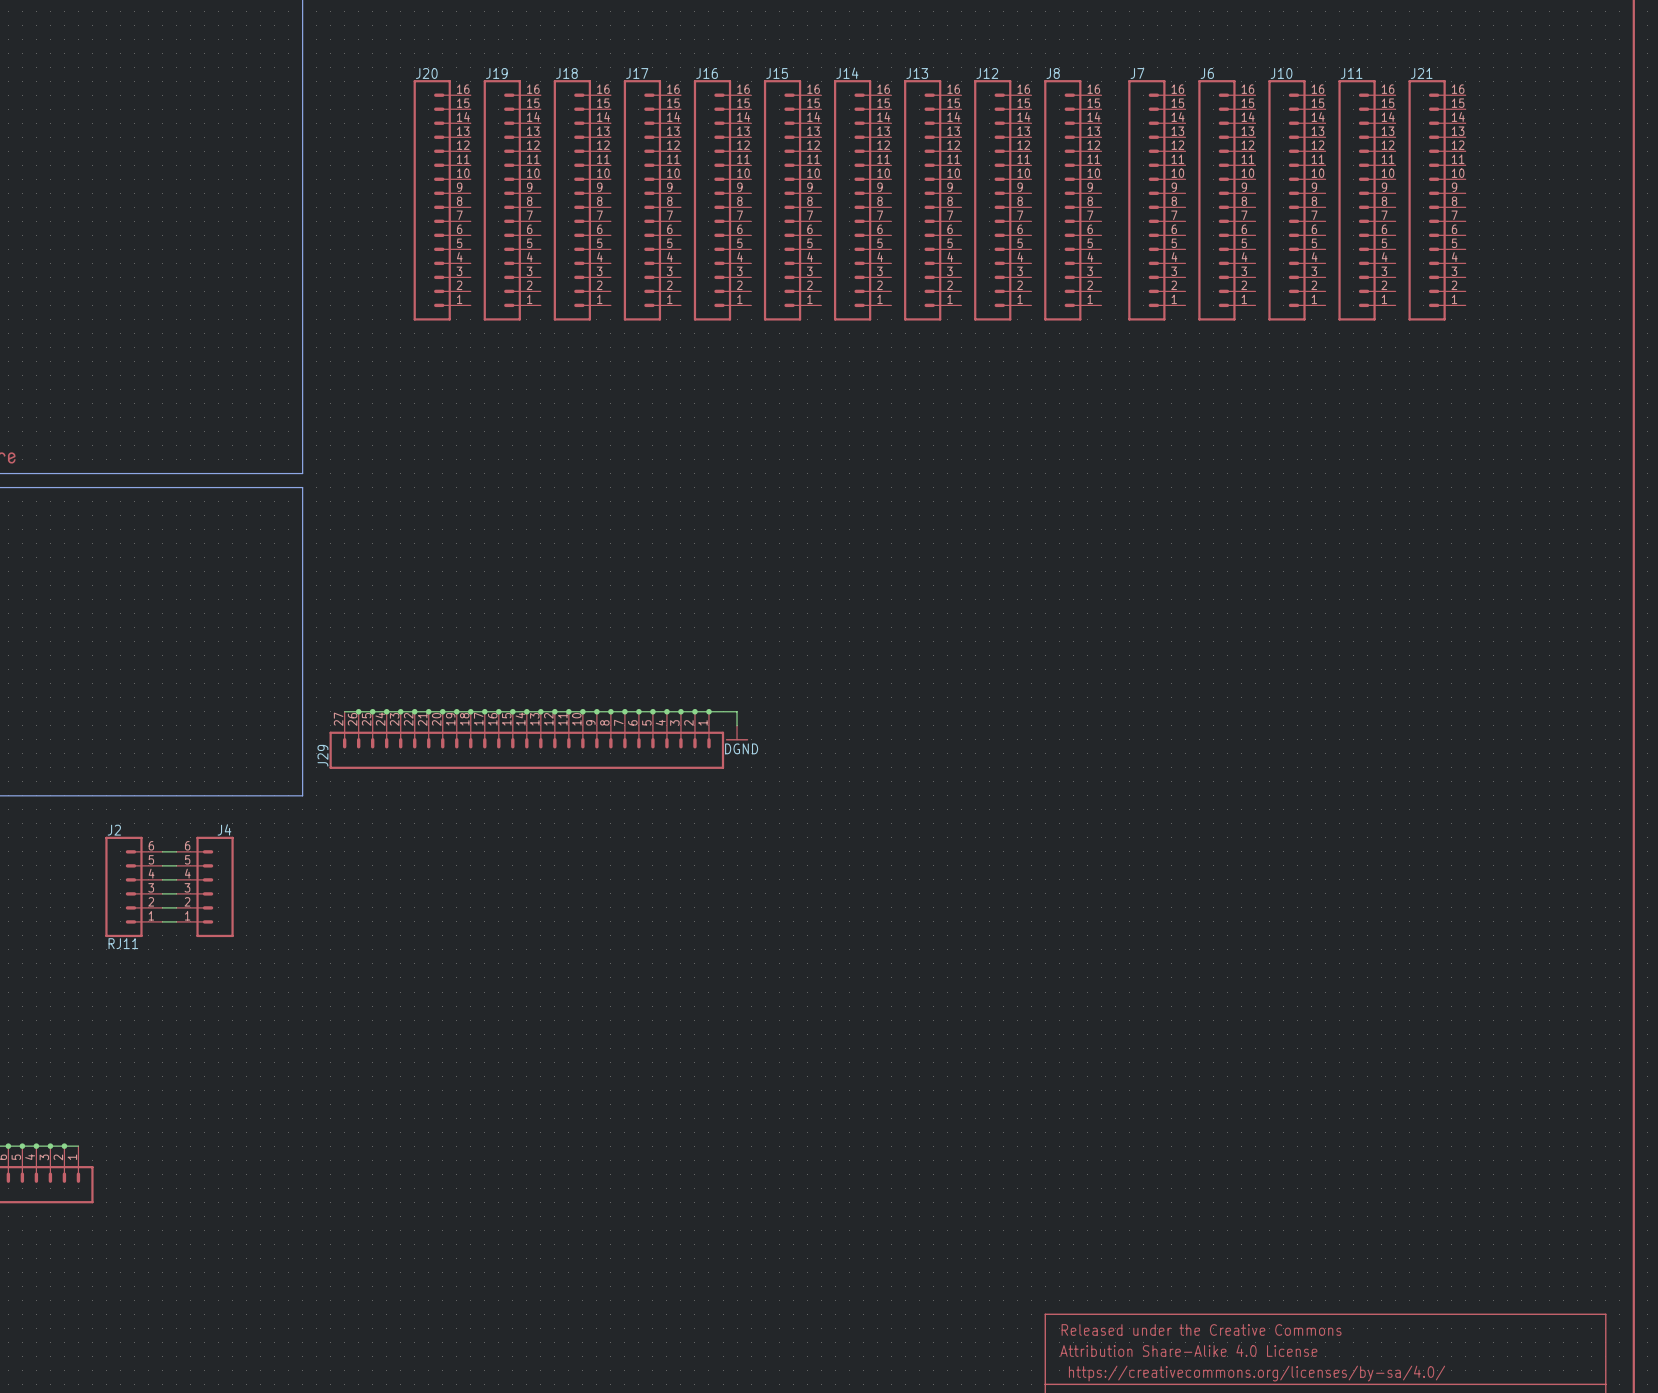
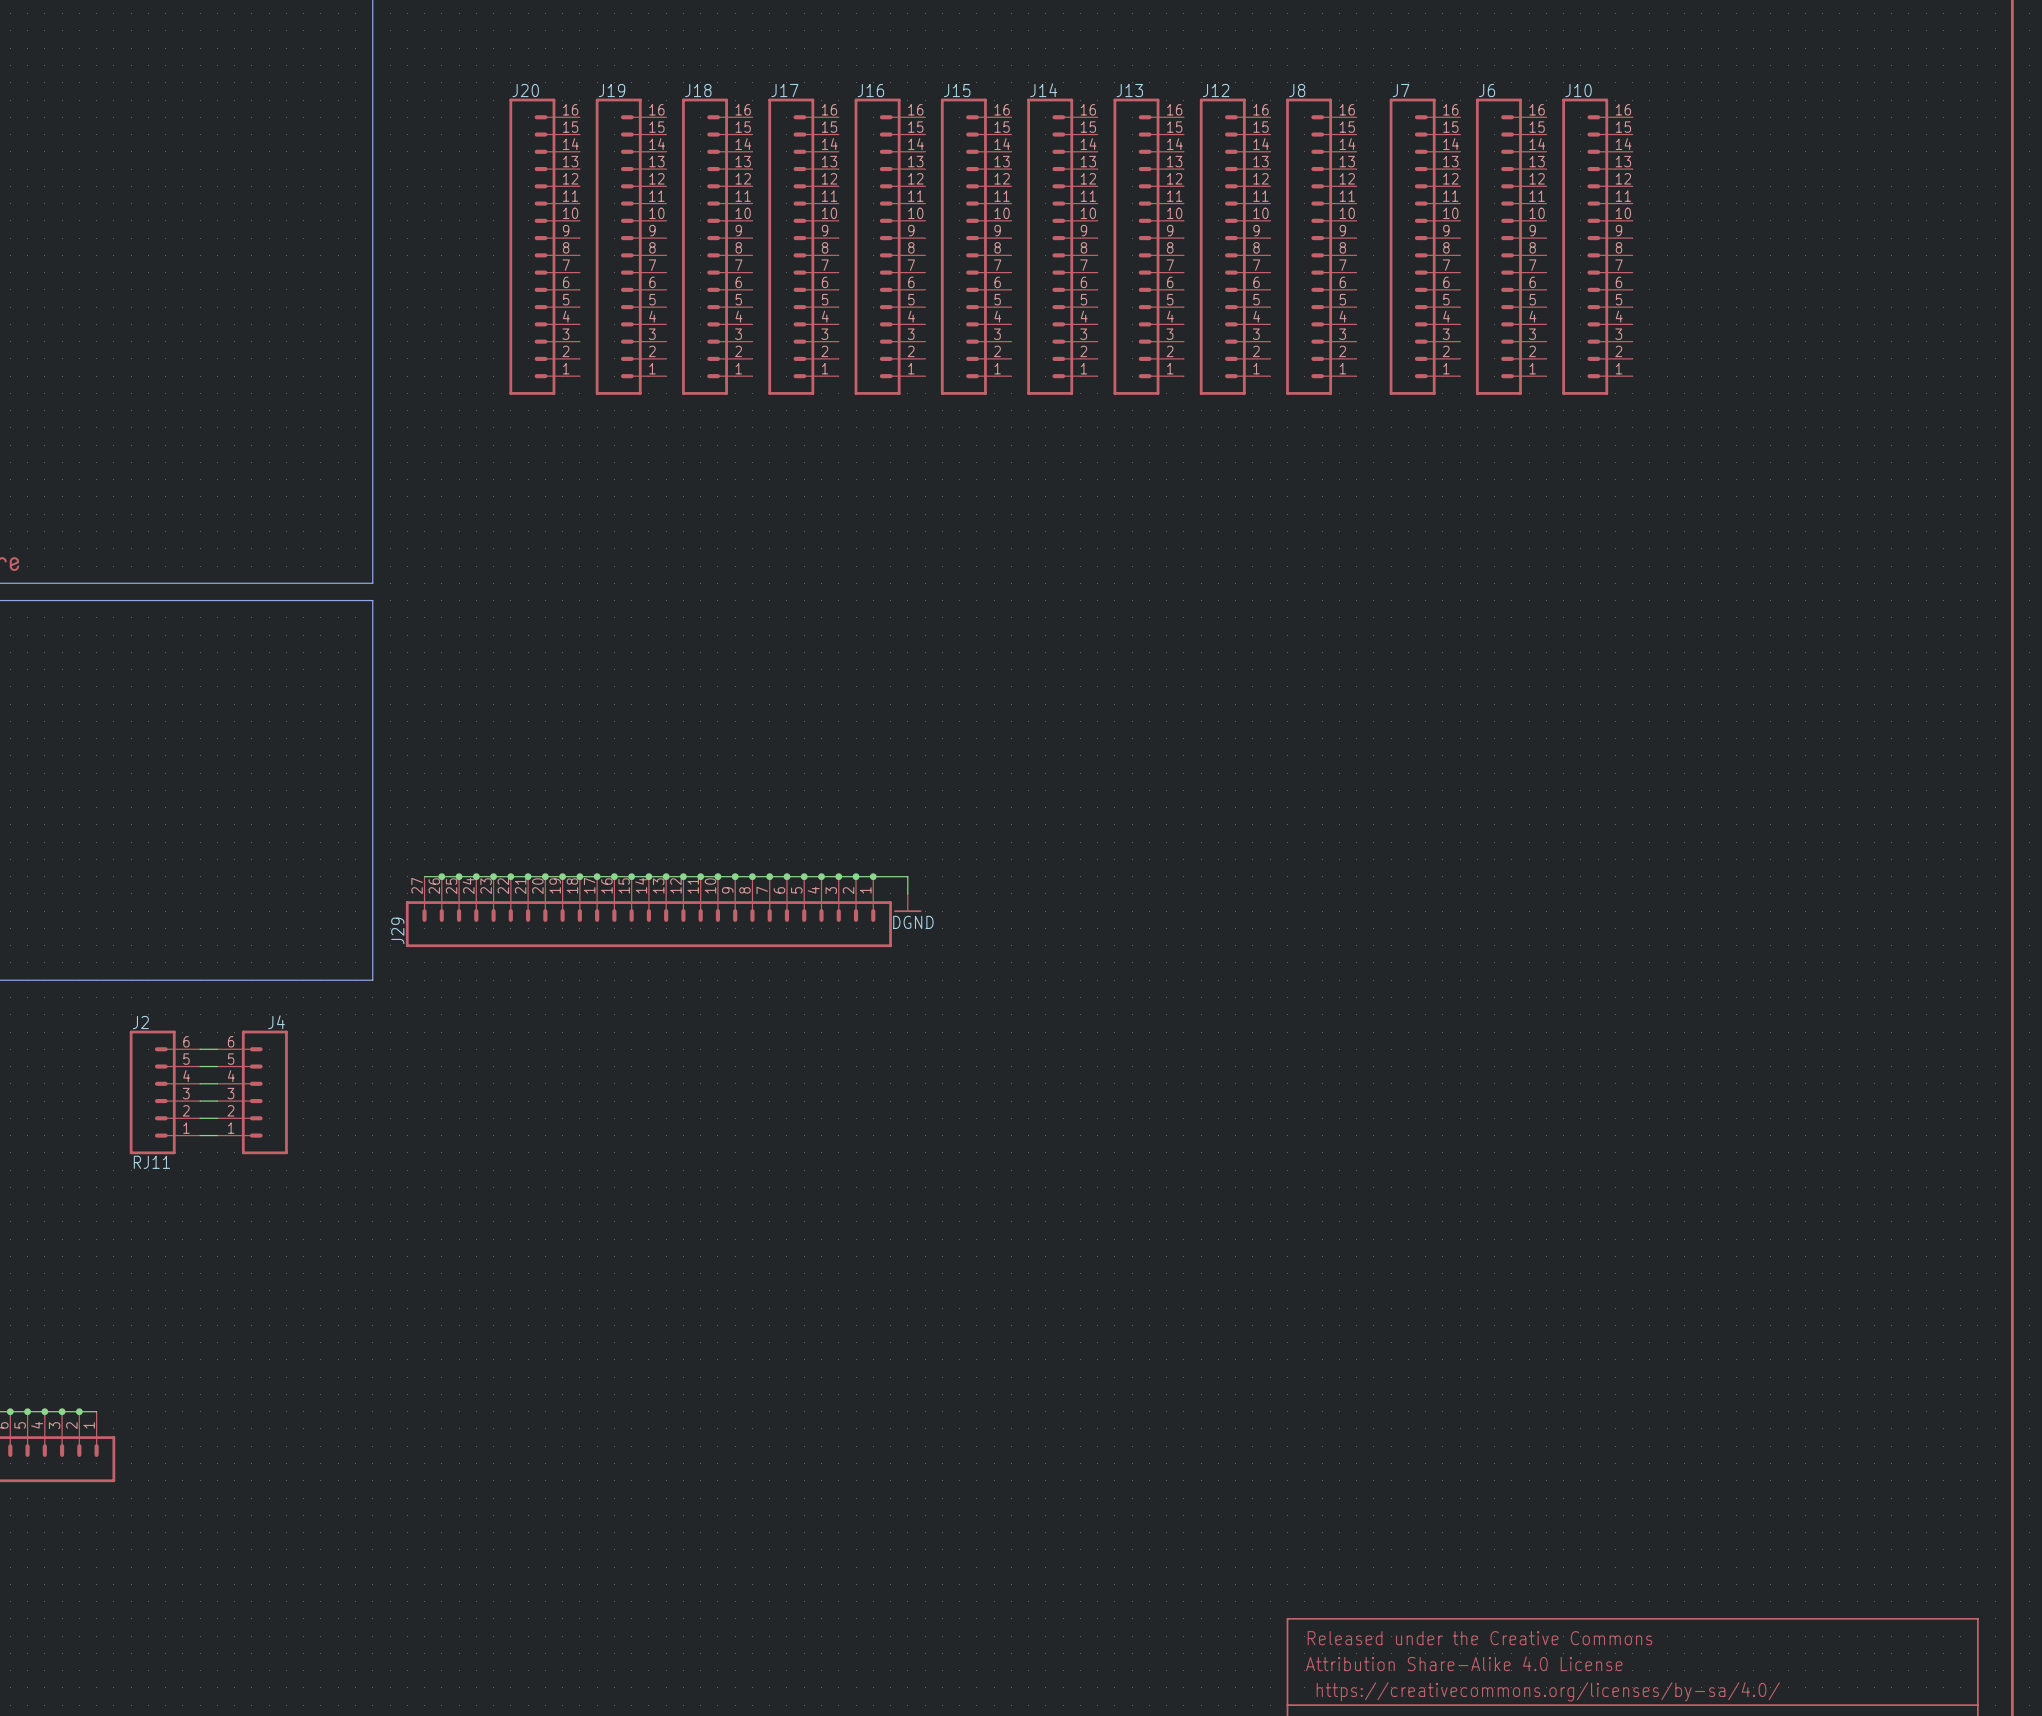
J11: (1367, 200) -> none
J21: (1437, 200) -> none

